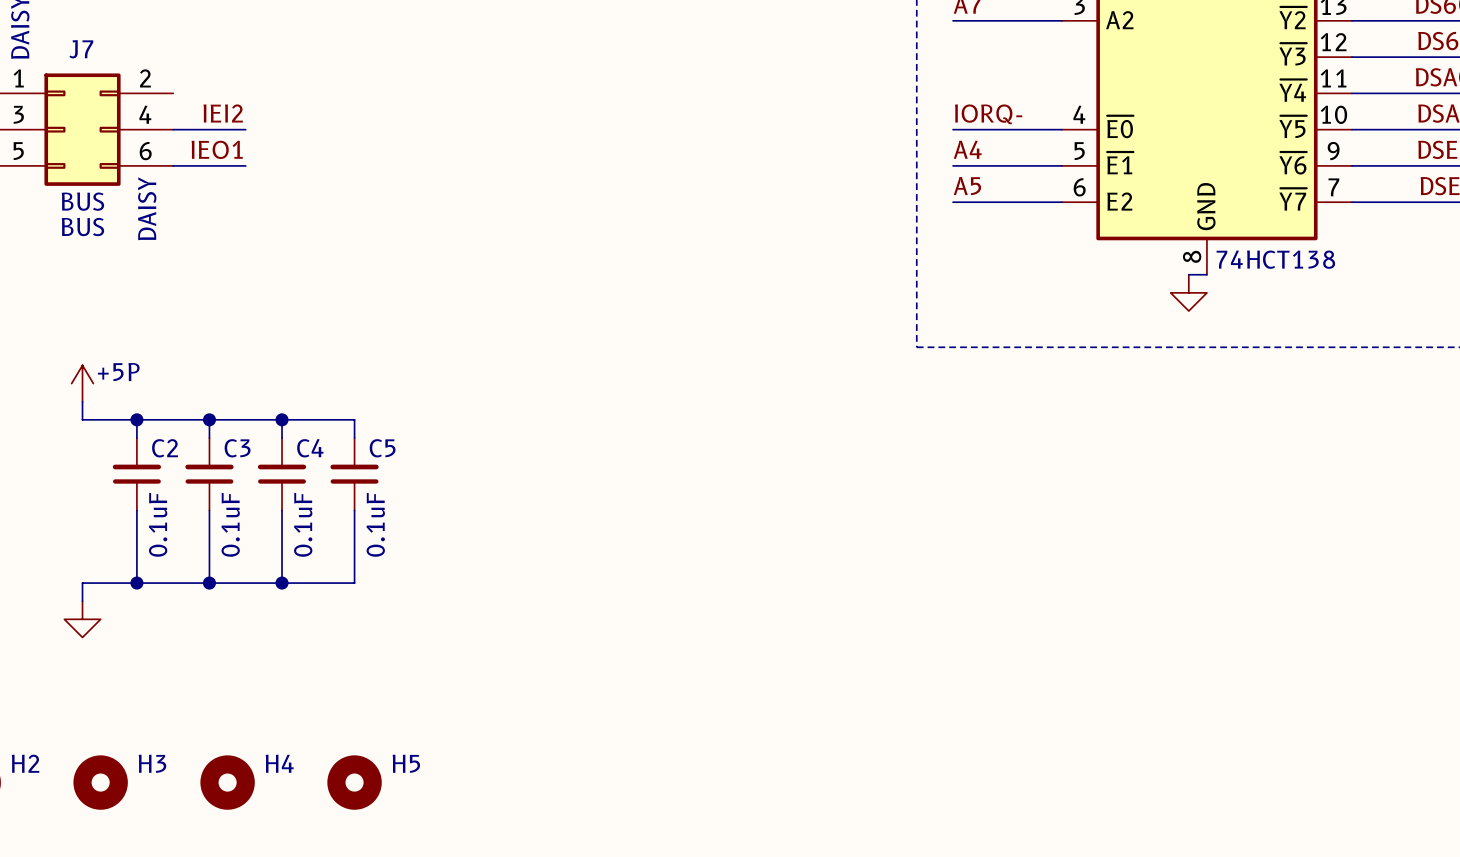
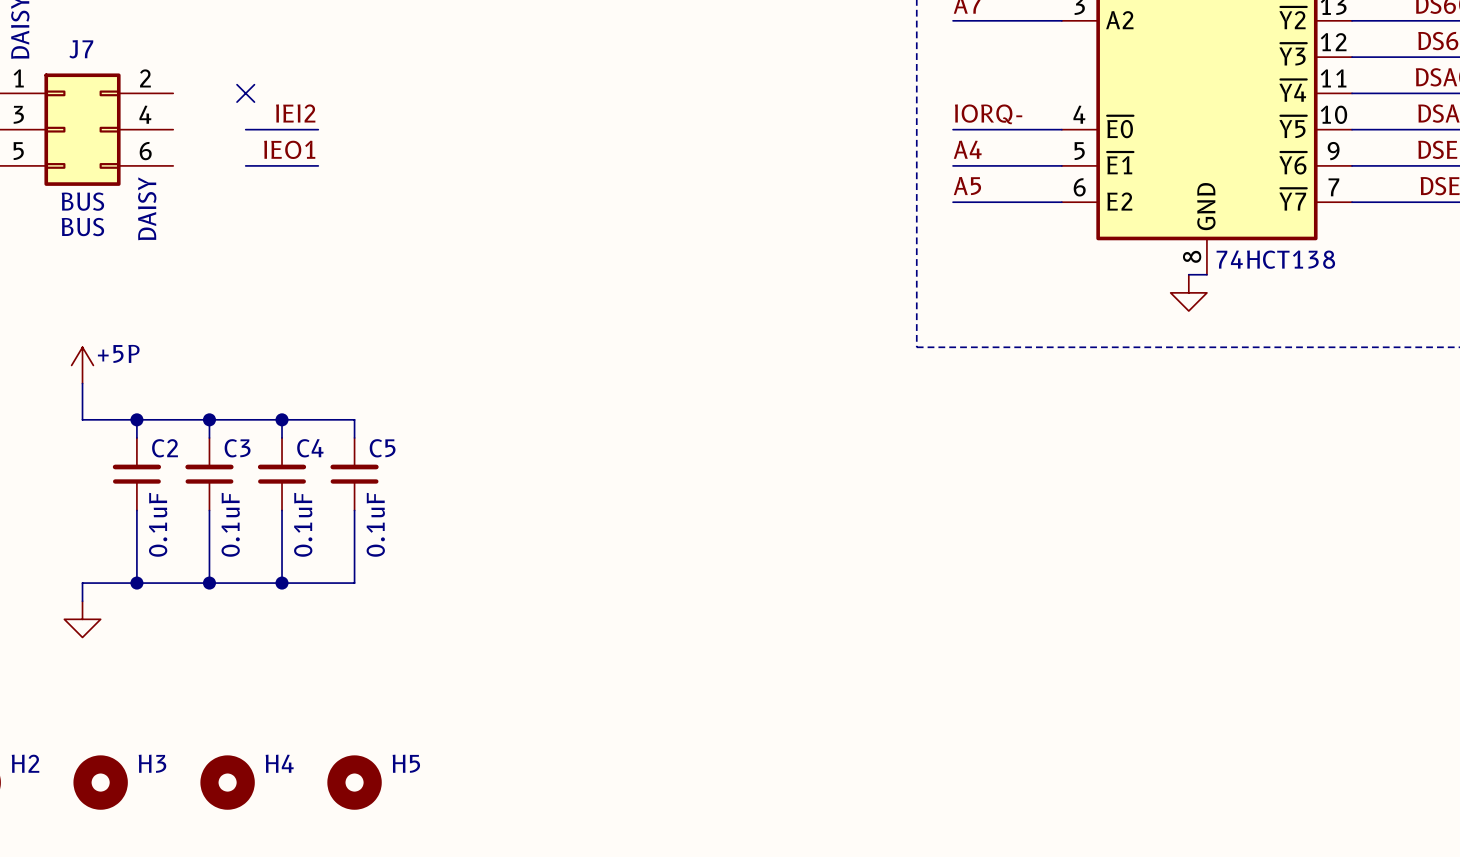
no-connect mark: none -> (245, 93)
label position: IEI2 (223, 113) -> IEI2 (295, 113)
wire: (173, 129) (245, 129) -> (318, 129) (245, 129)
label position: IEO1 (217, 149) -> IEO1 (289, 149)
wire: (173, 165) (245, 165) -> (318, 165) (245, 165)
power symbol position: +5P (82, 383) -> +5P (82, 365)

